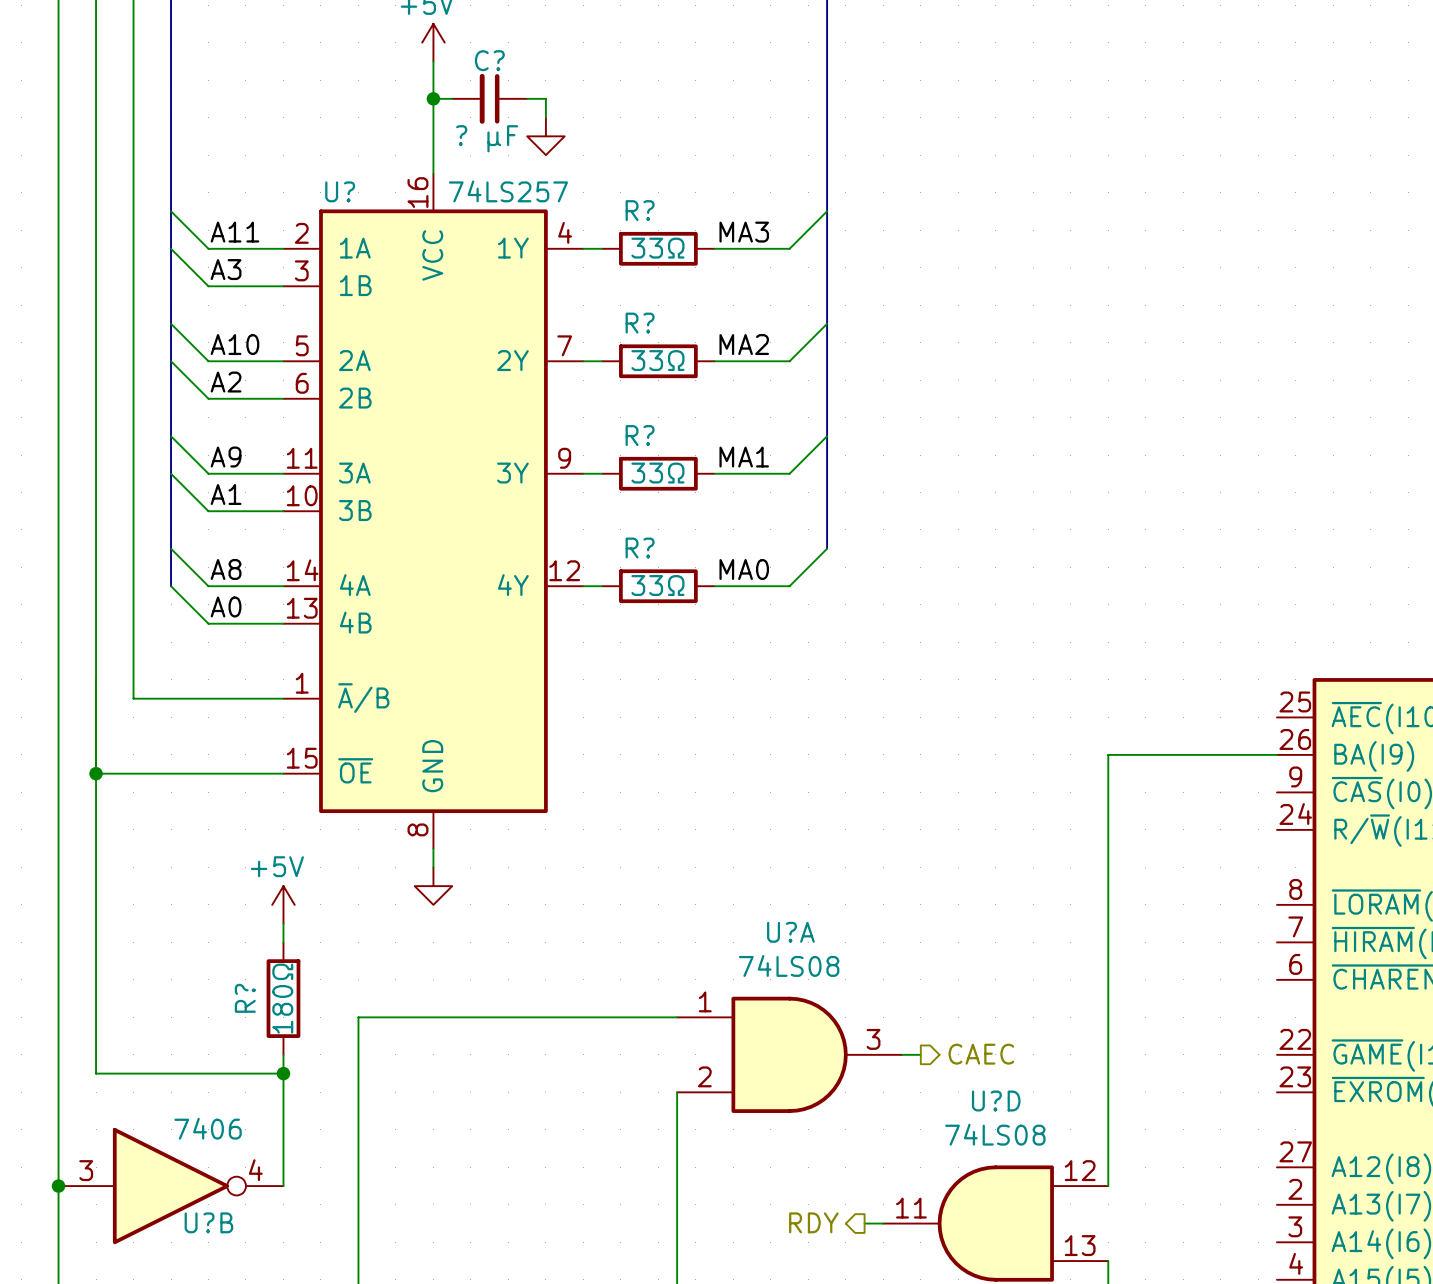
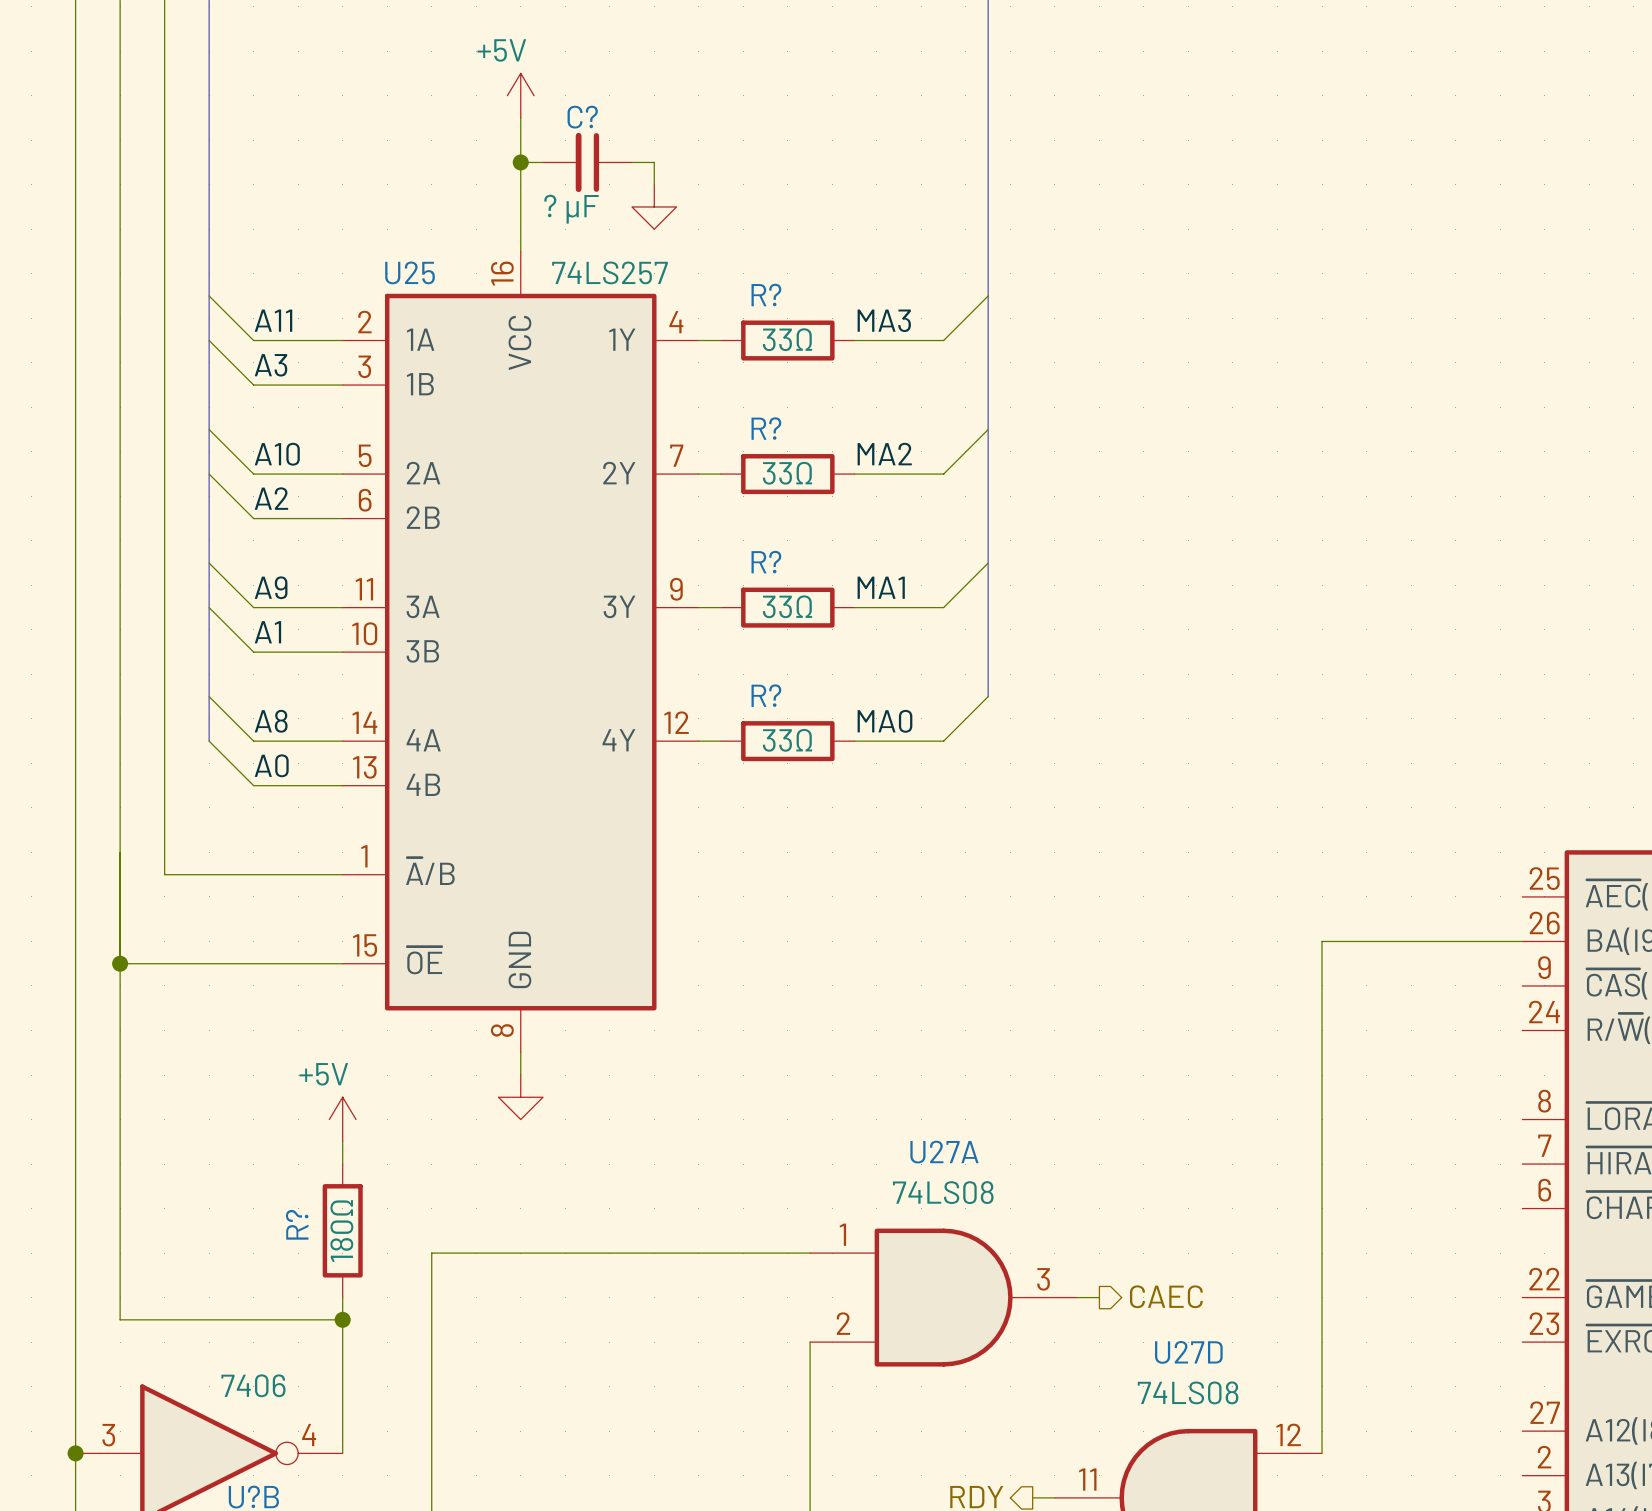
U? name: U? (340, 191) -> U25 (410, 272)
U?A name: U?A (790, 932) -> U27A (944, 1152)
U?D name: U?D (996, 1101) -> U27D (1188, 1352)

